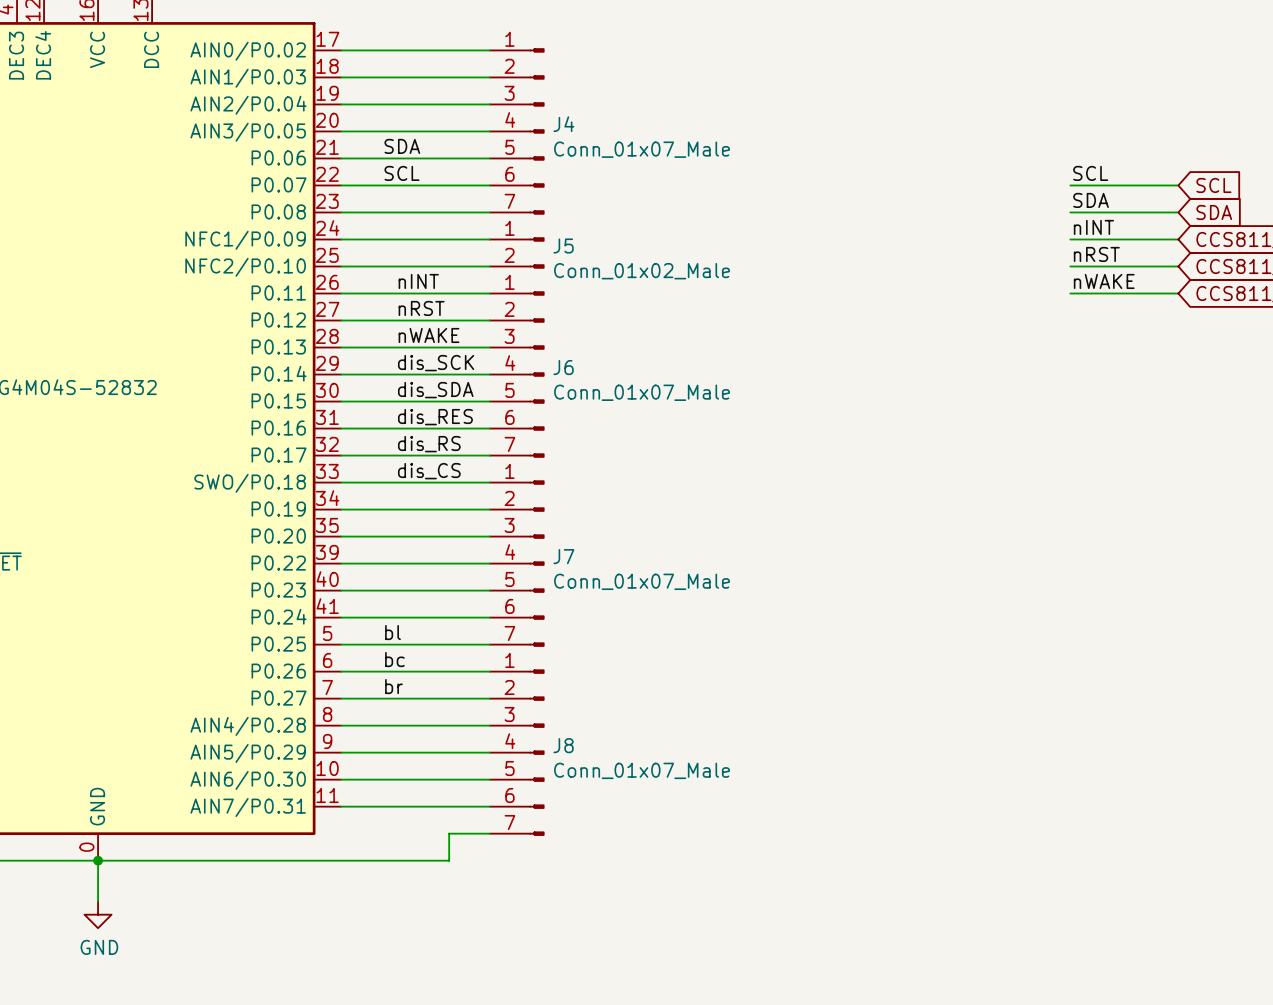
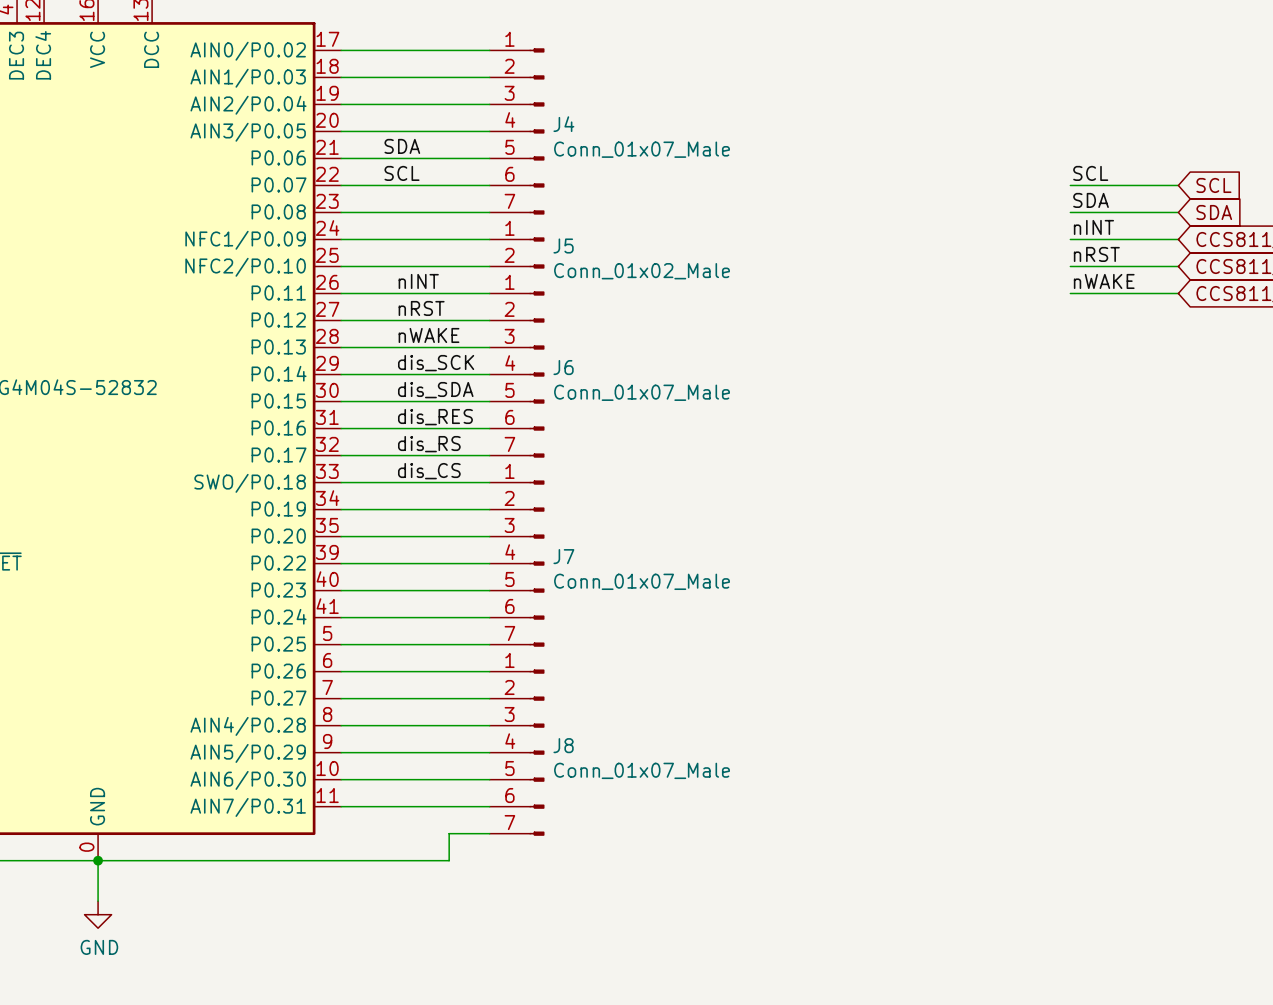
label: bl (393, 632) -> none
label: bc (394, 659) -> none
label: br (393, 686) -> none

